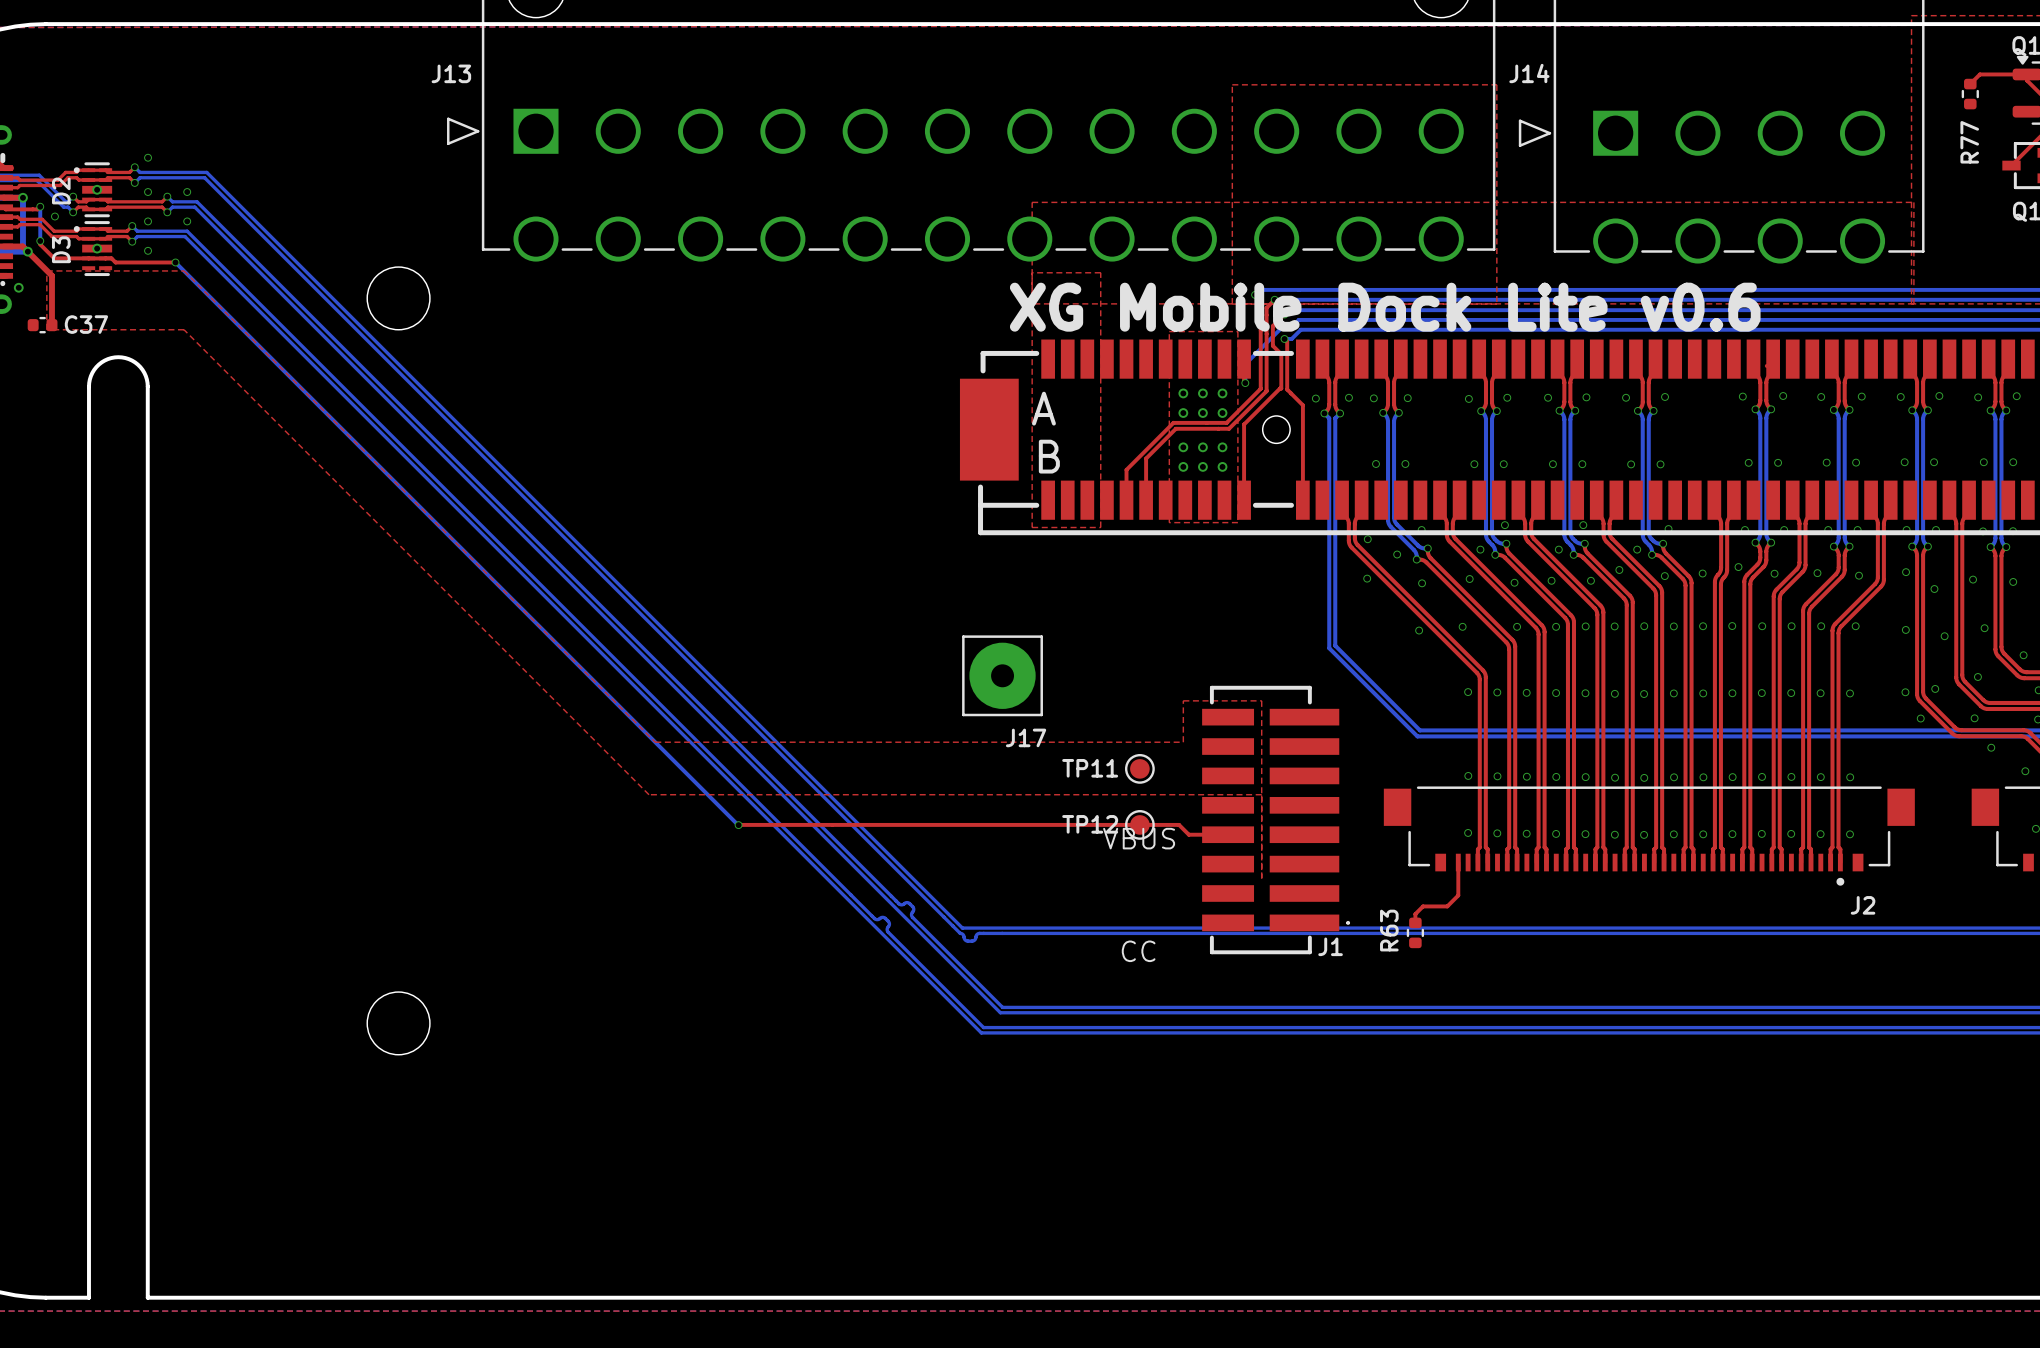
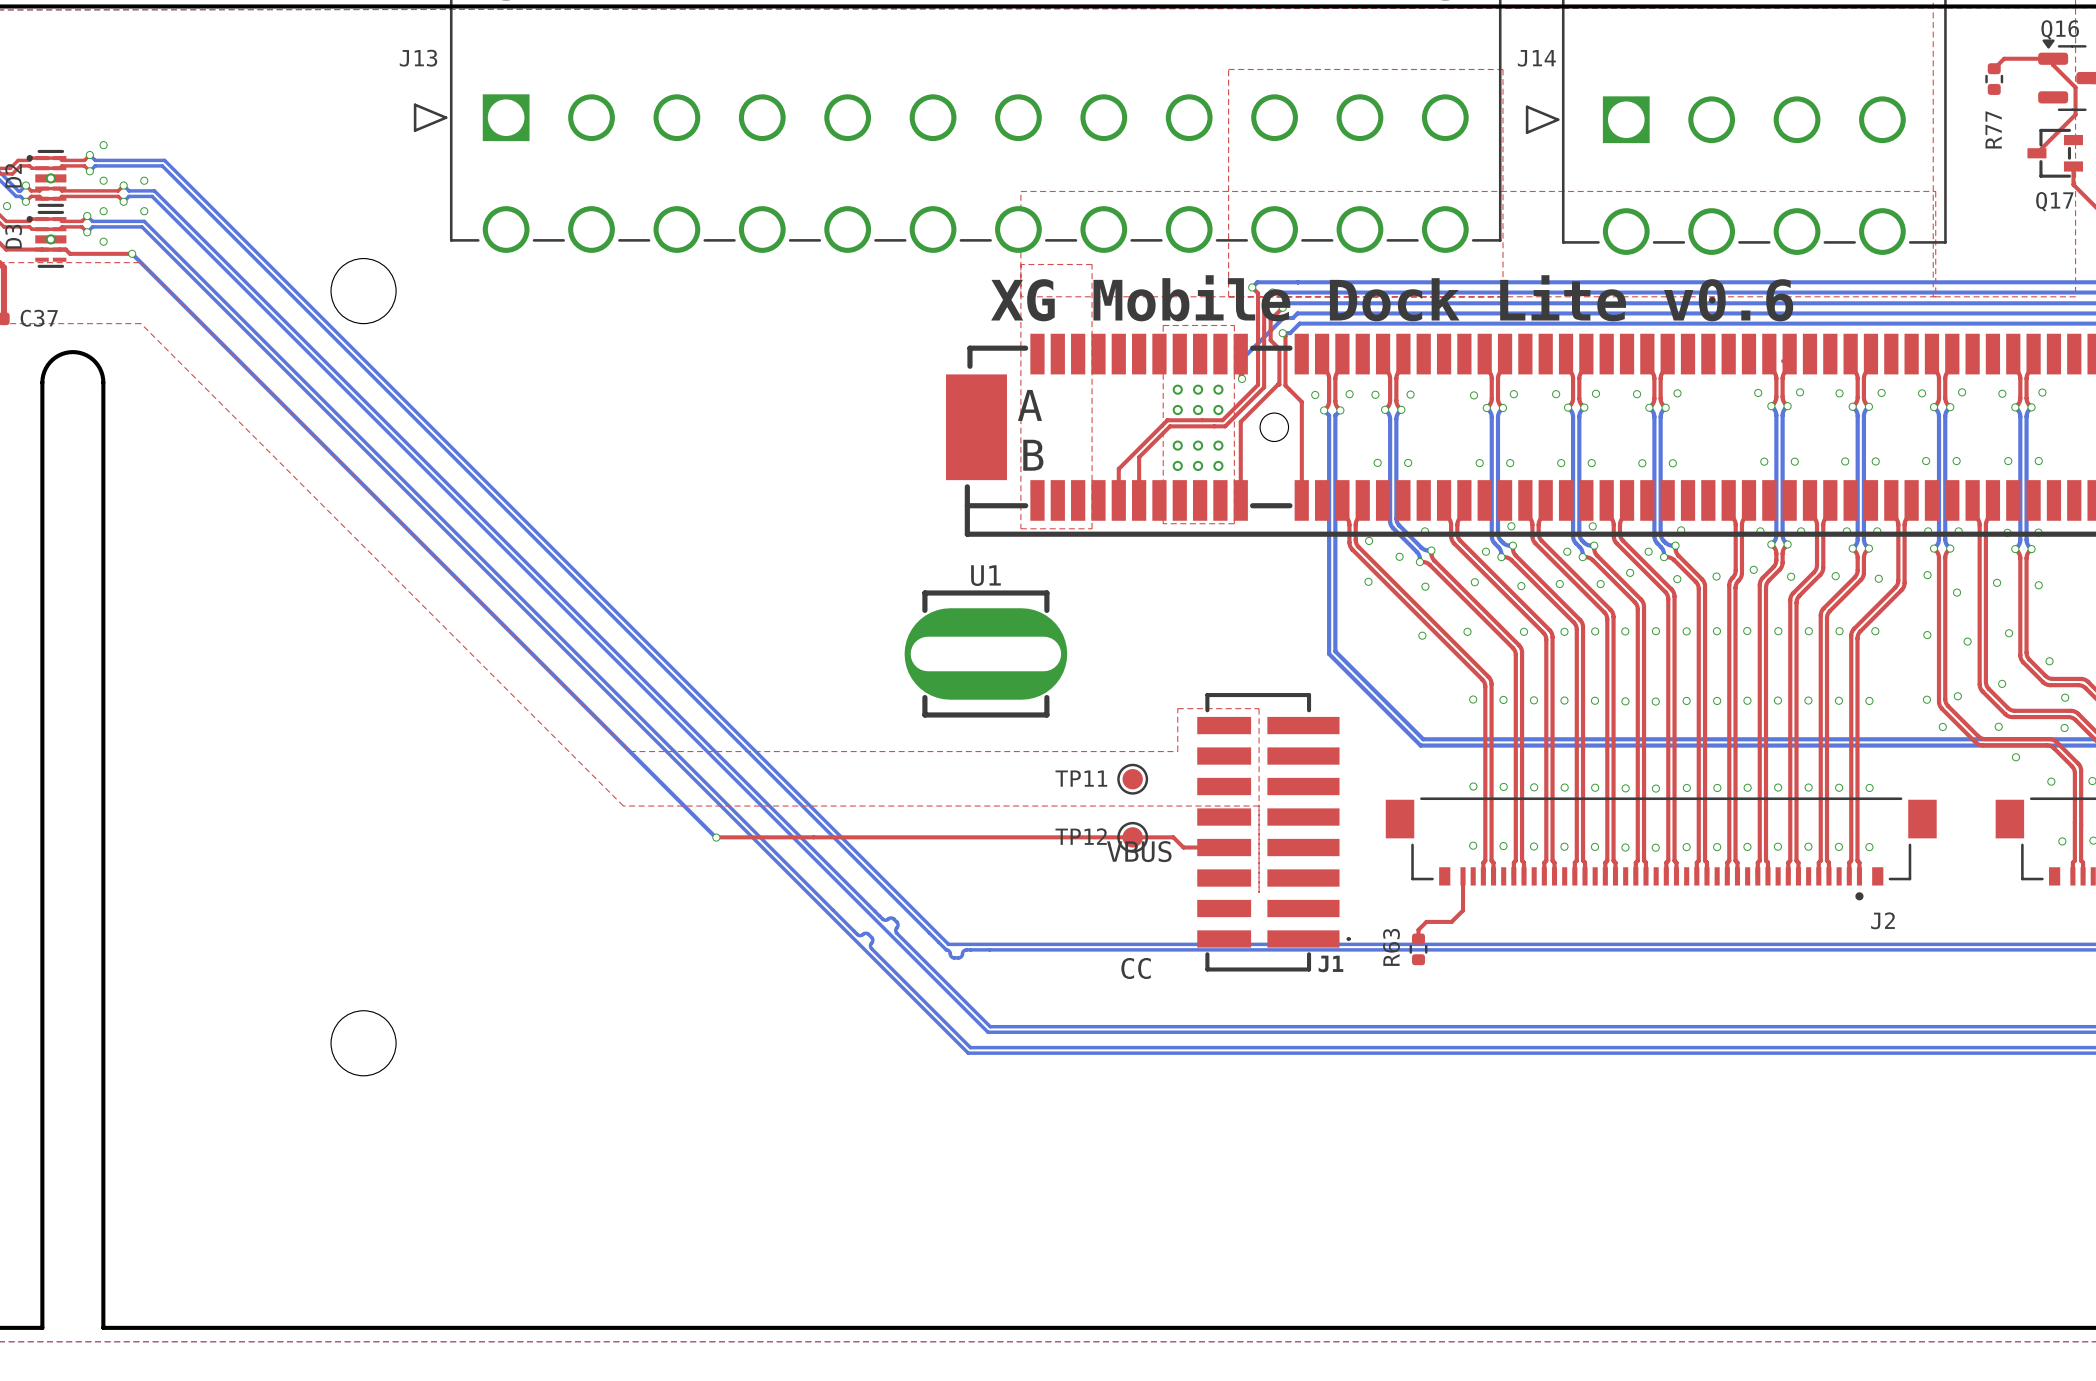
U1: none -> (985, 653)
J17: (1002, 675) -> none

